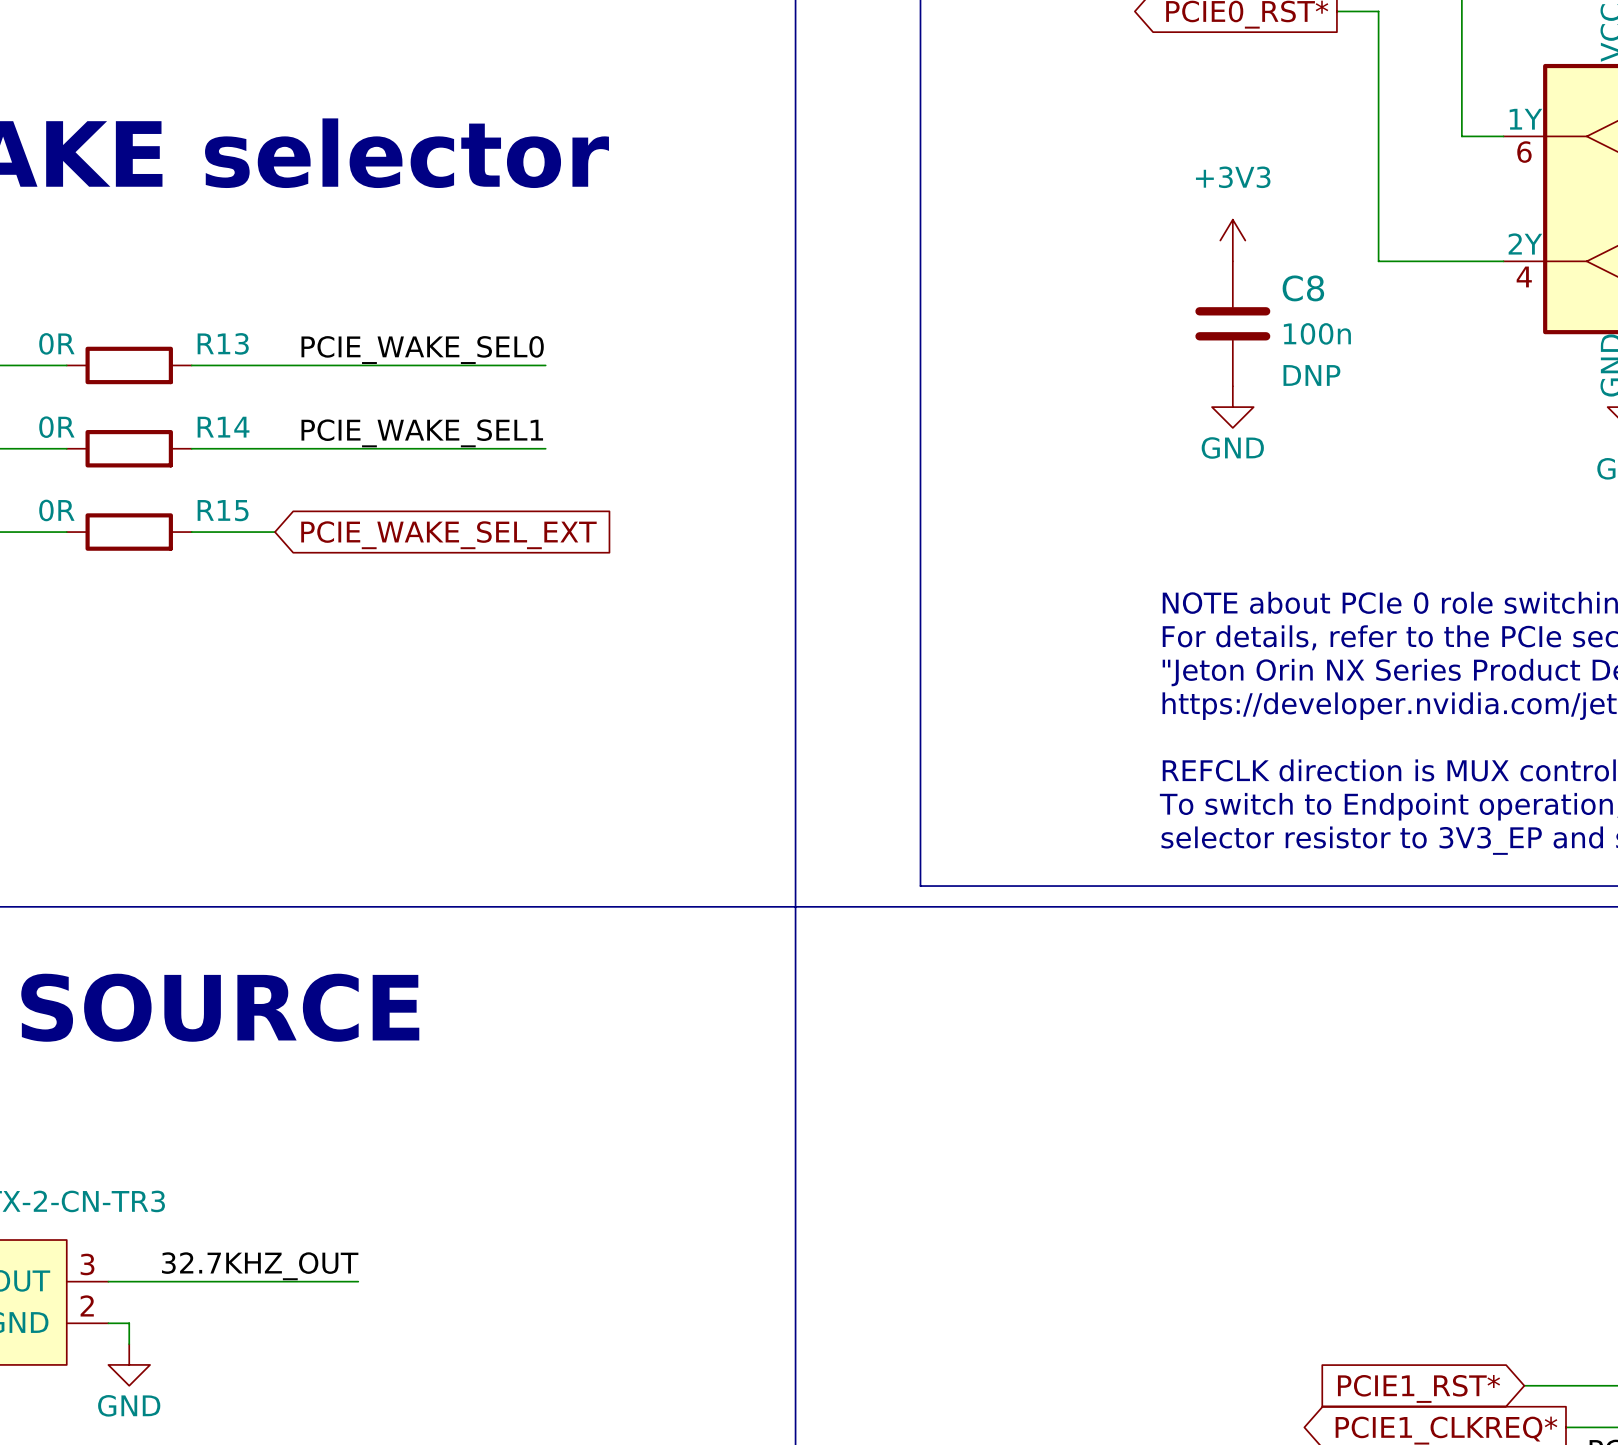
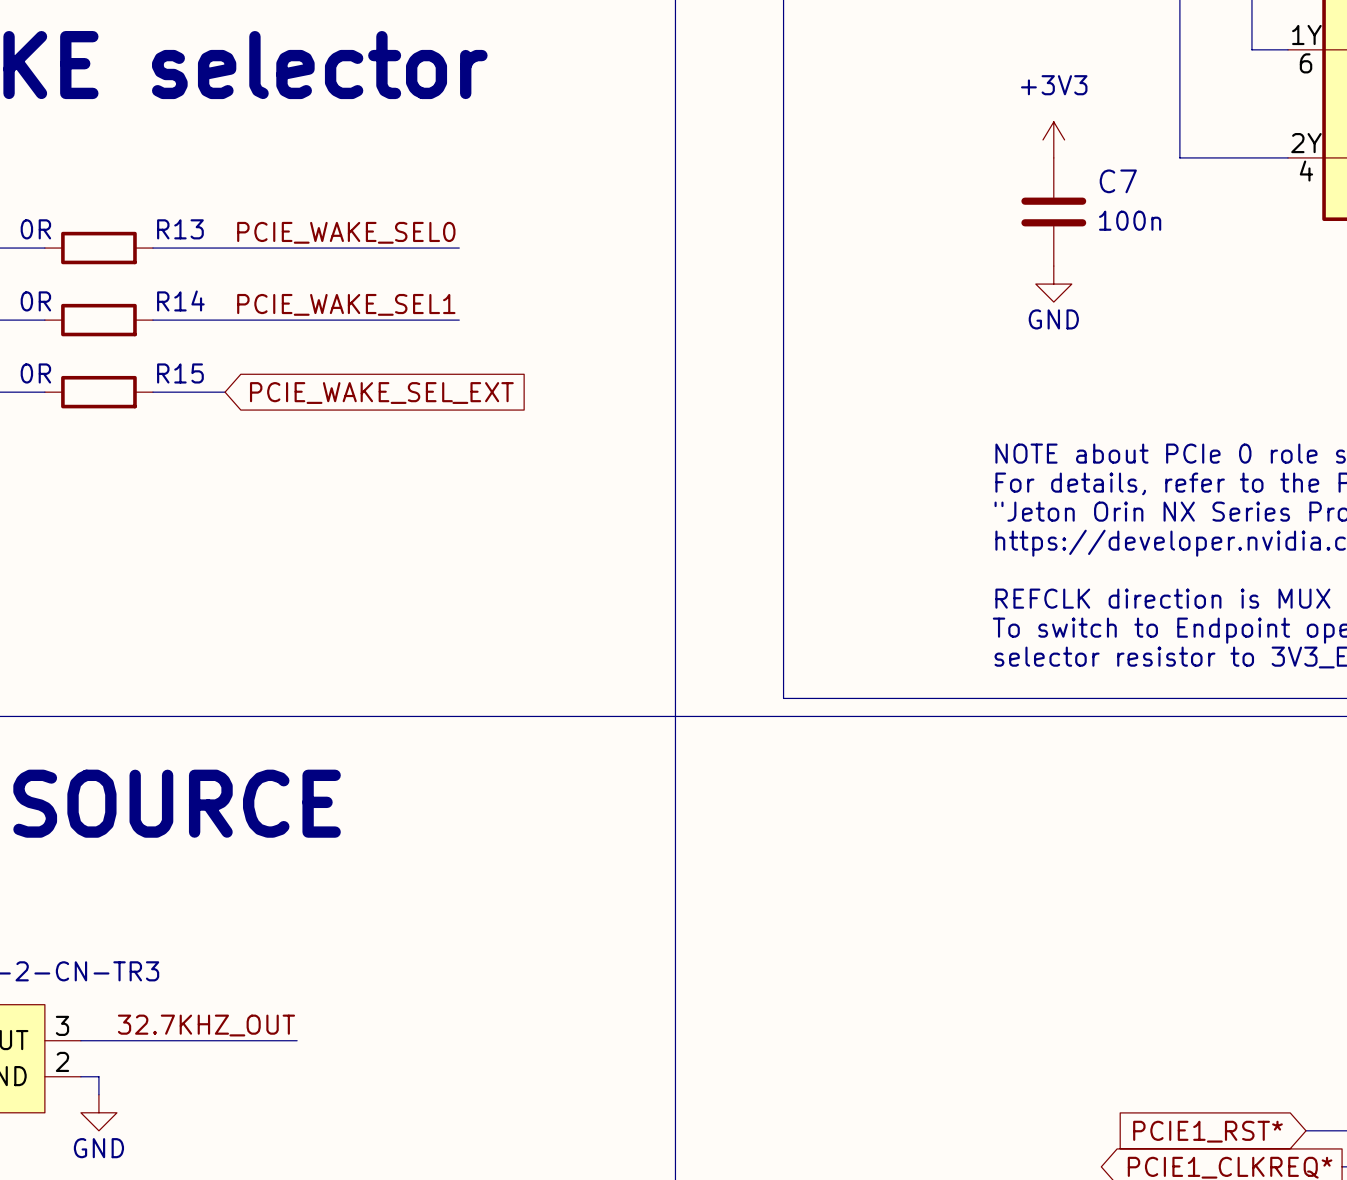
C8 name: C8 (1303, 288) -> C7 (1118, 181)
C8 text: DNP (1311, 375) -> none

